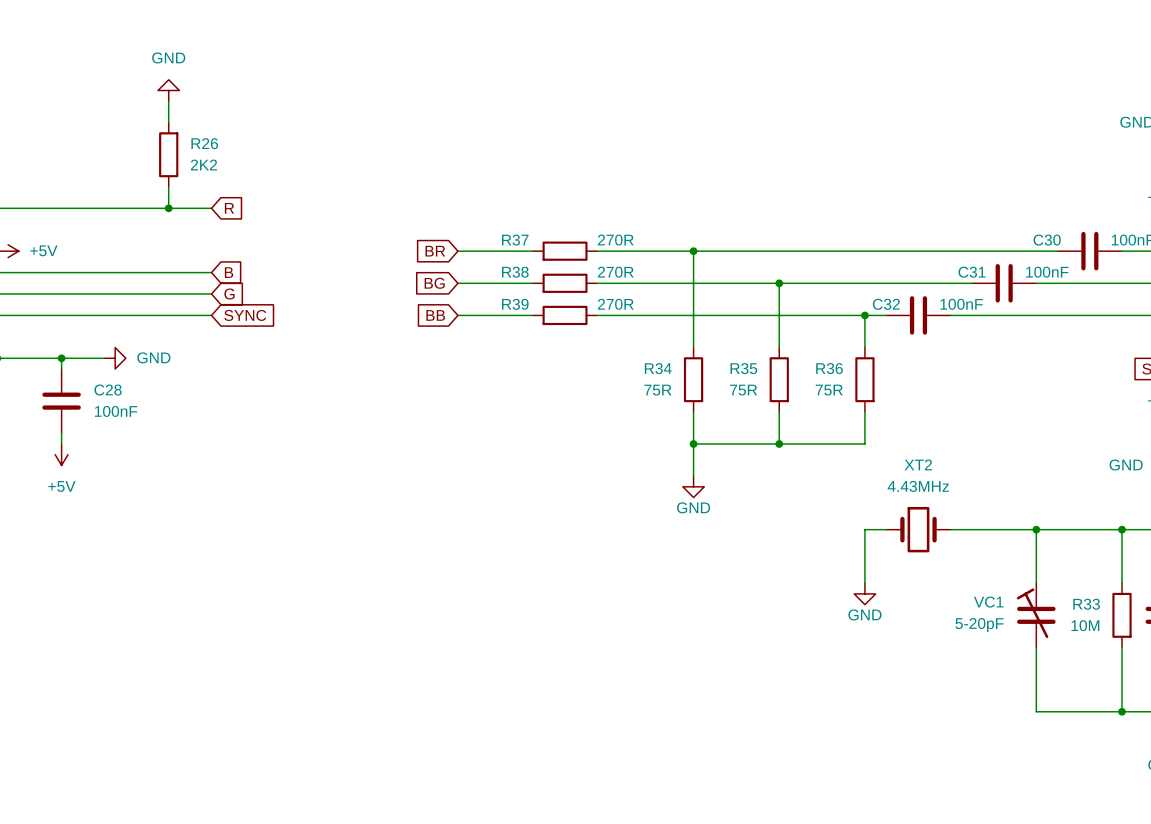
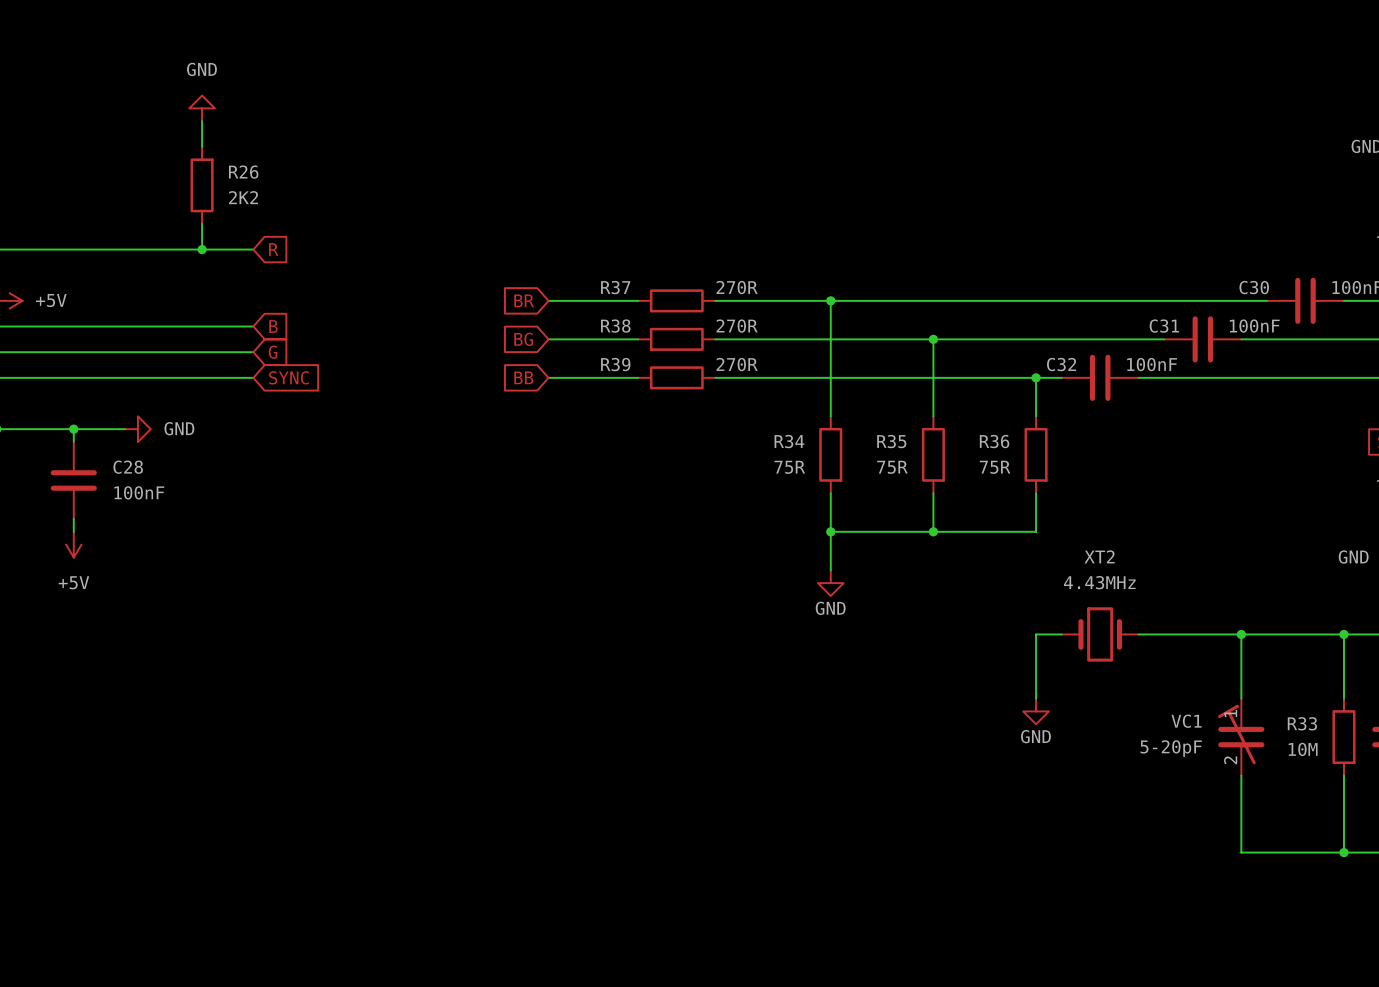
VC1 pin number: none -> 1 (1230, 713)
VC1 pin number: none -> 2 (1230, 760)

